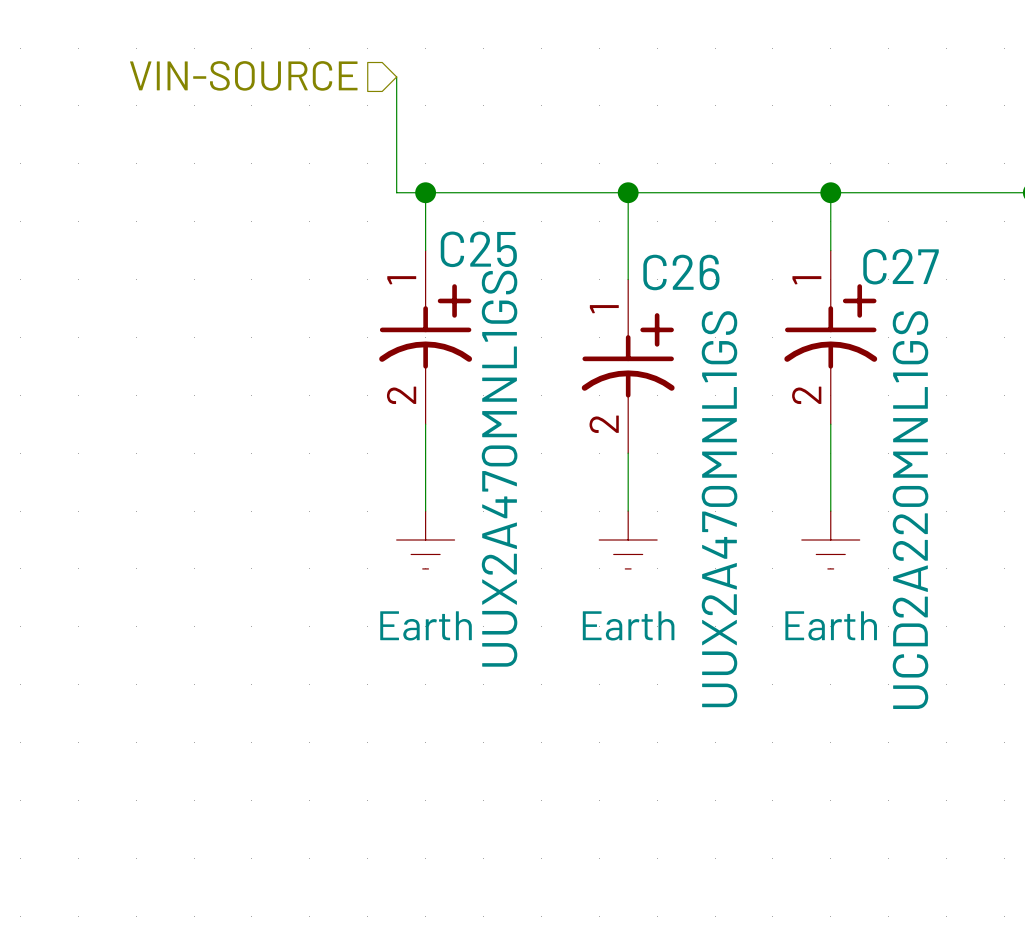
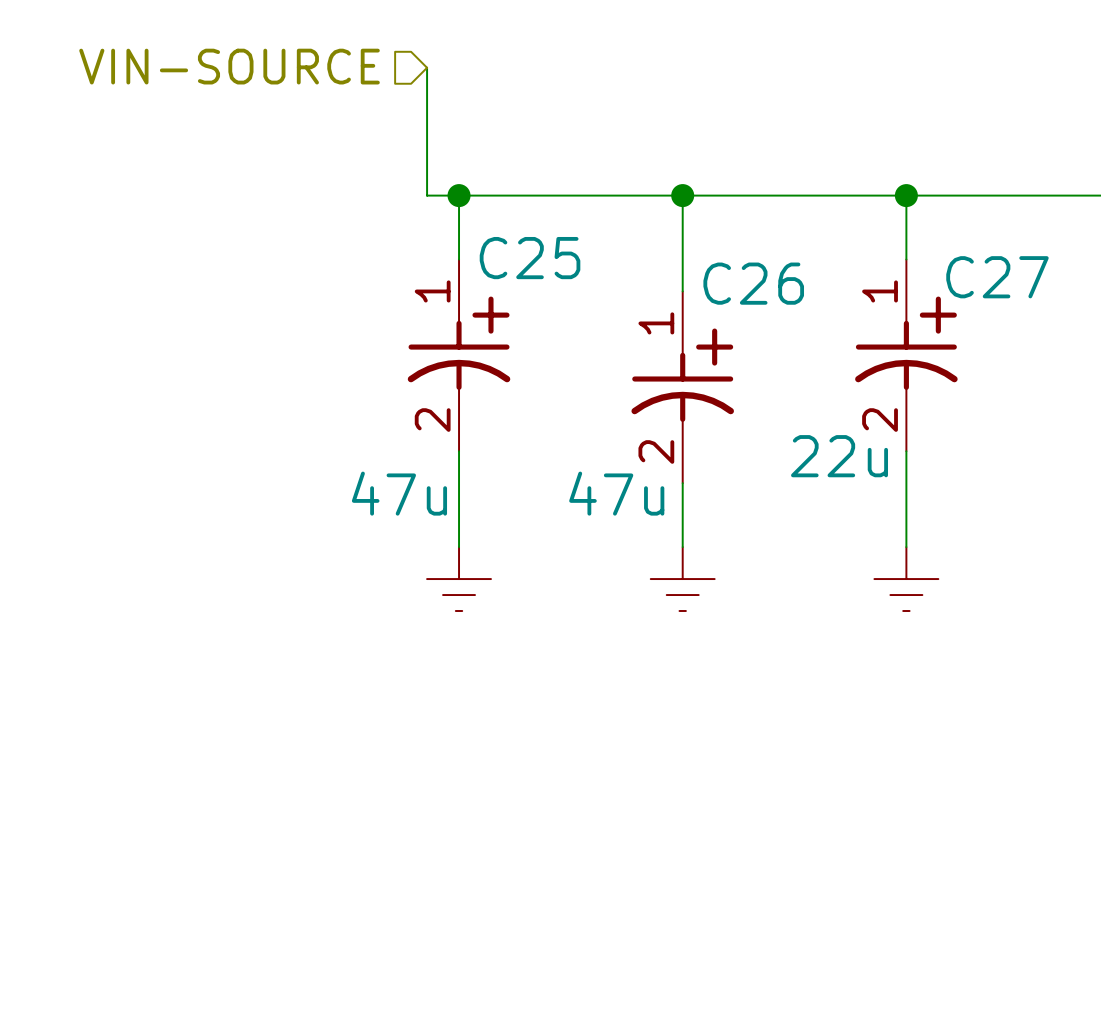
C25 value: UUX2A470MNL1GS (499, 468) -> 47u (399, 493)
C26 value: UUX2A470MNL1GS (719, 509) -> 47u (616, 493)
C27 value: UCD2A220MNL1GS (910, 510) -> 22u (839, 456)
power symbol text: Earth (426, 625) -> none
power symbol text: Earth (628, 625) -> none
power symbol text: Earth (831, 625) -> none

